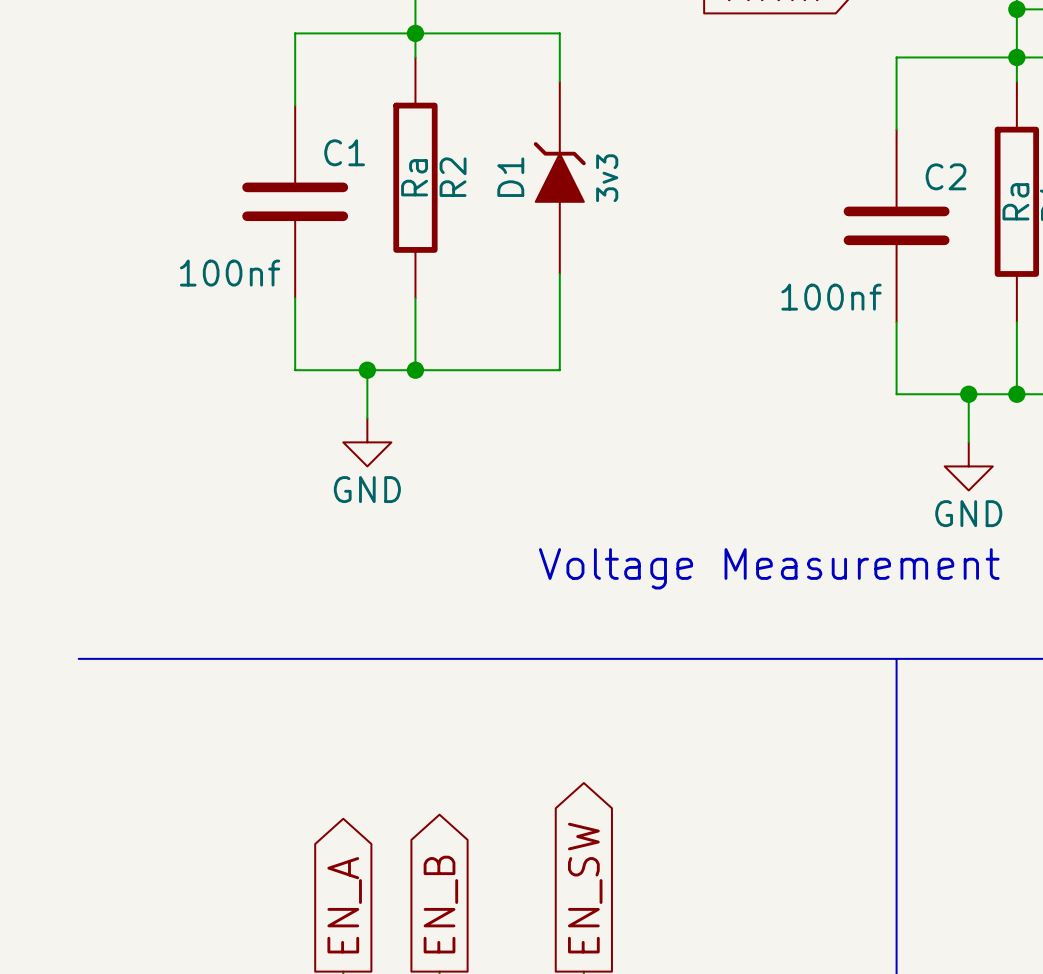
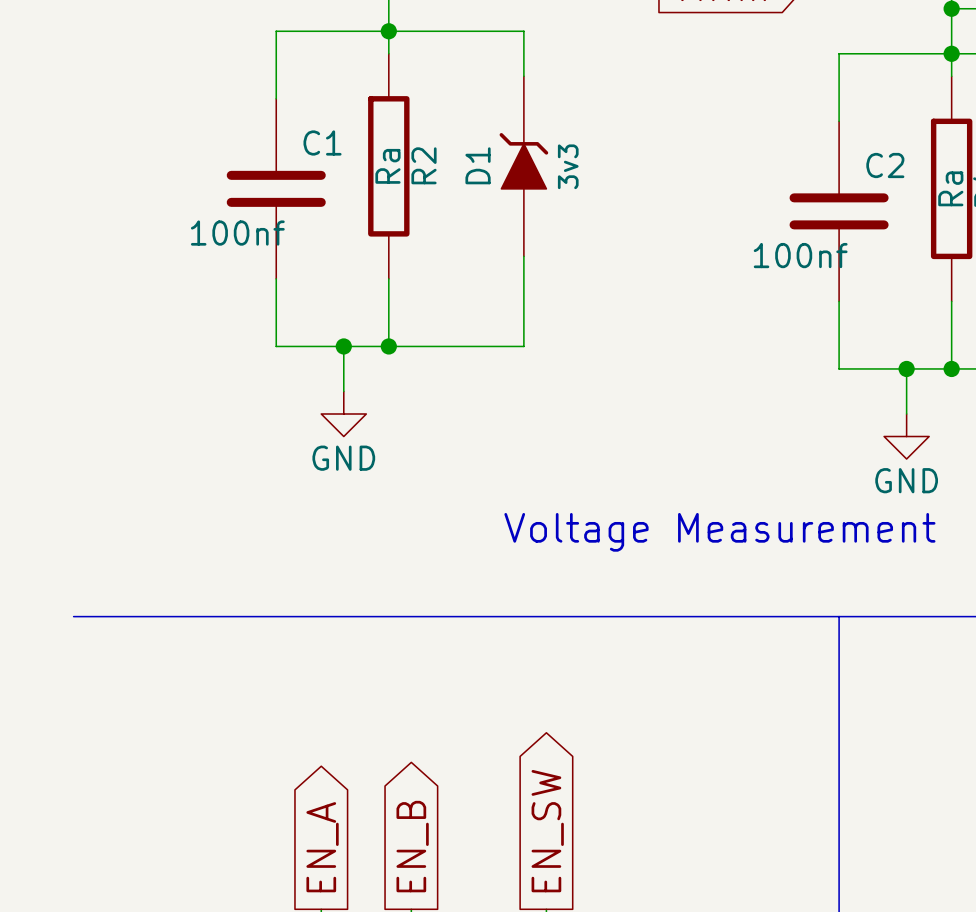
C1 value position: 100nf (230, 273) -> 100nf (237, 233)
C2 value position: 100nf (831, 297) -> 100nf (800, 255)

